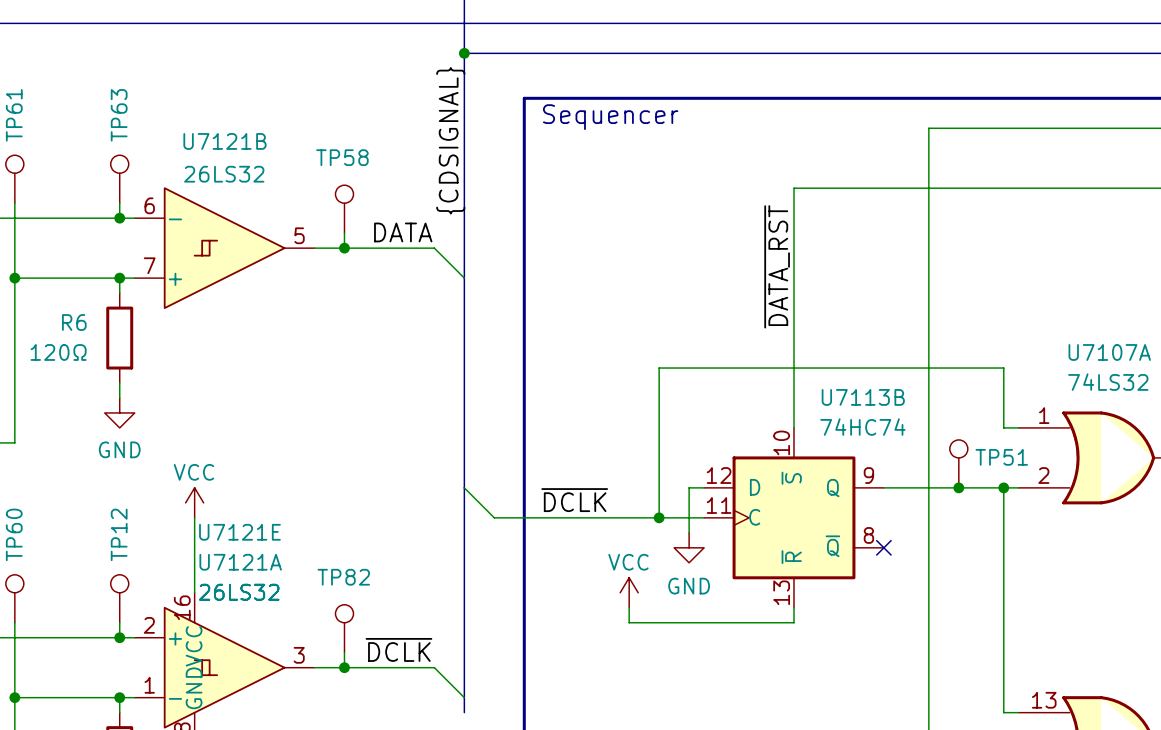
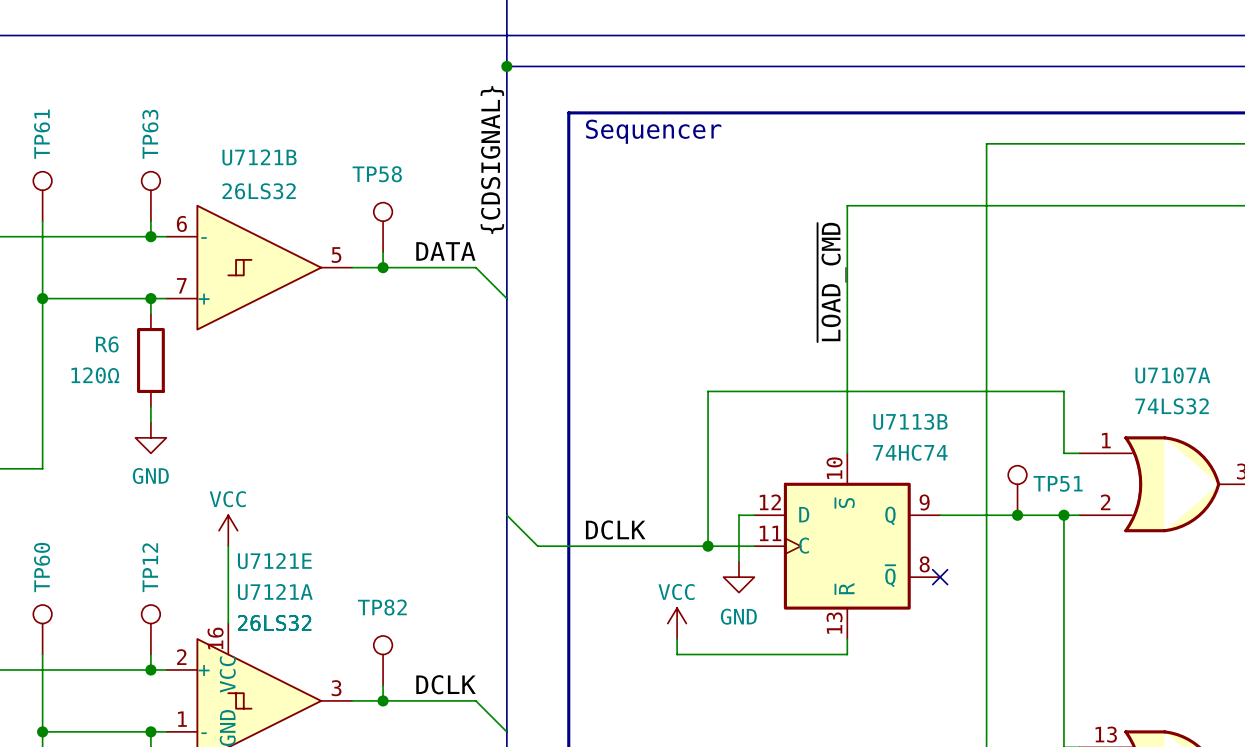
label: ~{DATA_RST} (777, 266) -> ~{LOAD_CMD} (831, 282)
label: ~{DCLK} (574, 500) -> DCLK (615, 530)
label: ~{DCLK} (398, 649) -> DCLK (446, 684)

